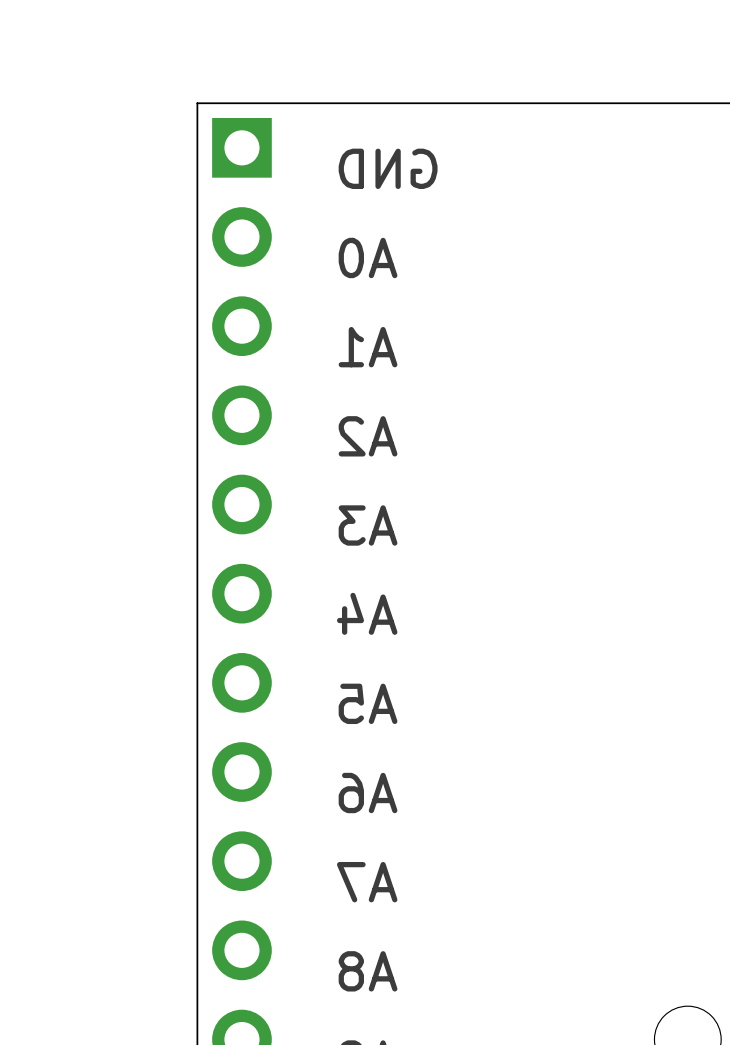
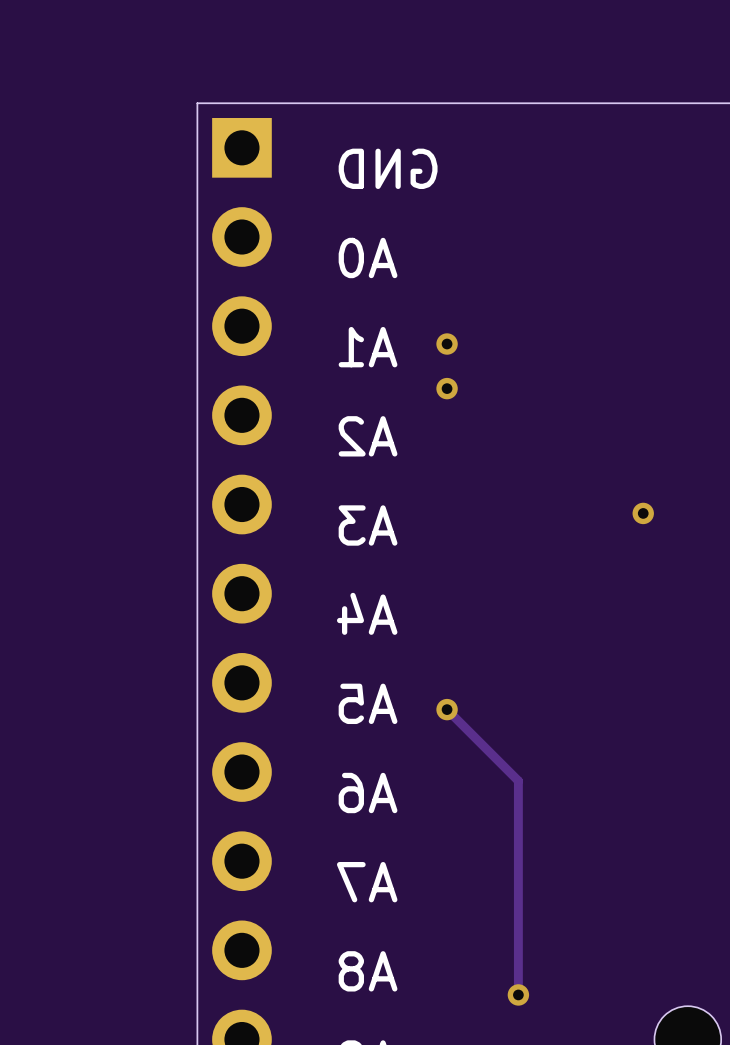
via: none -> (447, 344)
via: none -> (447, 388)
via: none -> (643, 513)
track: none -> (447, 709) (518, 780) (518, 994)
via: none -> (447, 709)
via: none -> (518, 994)

